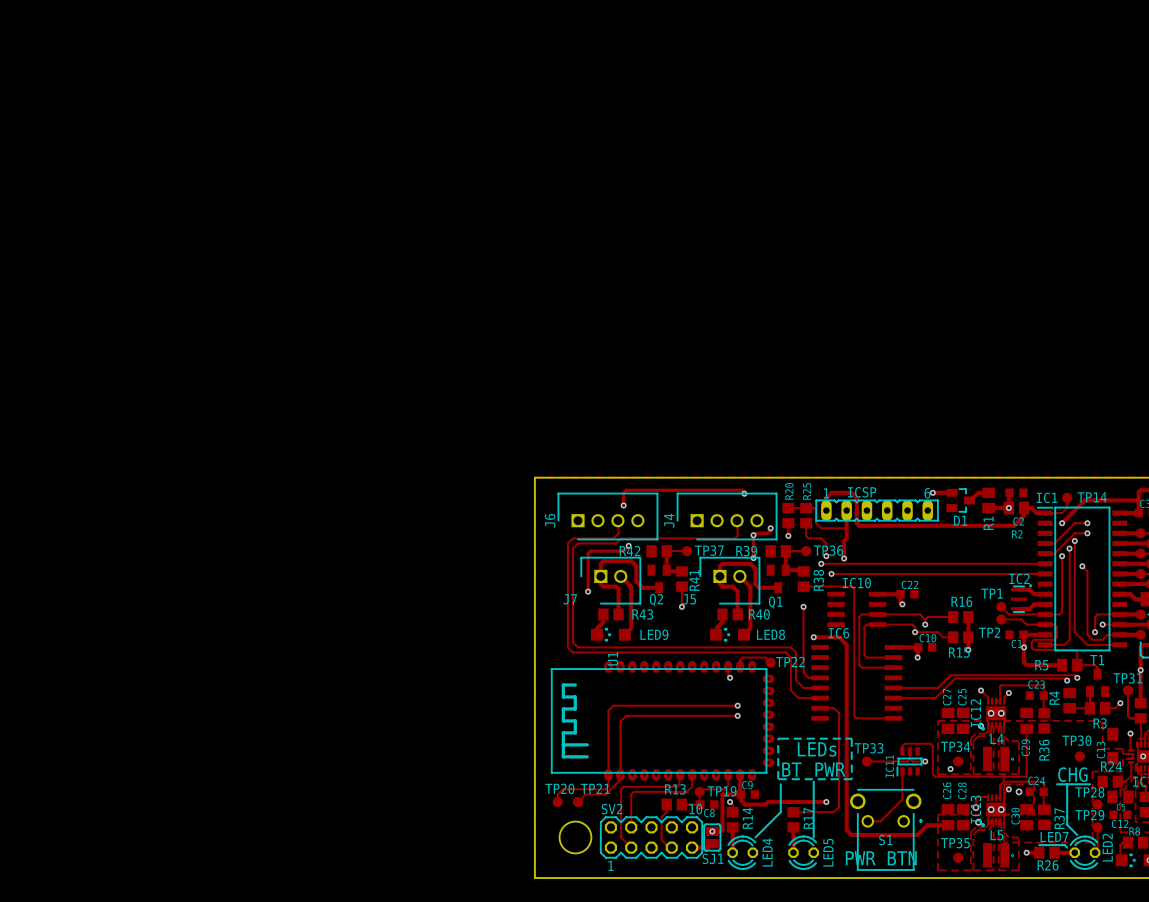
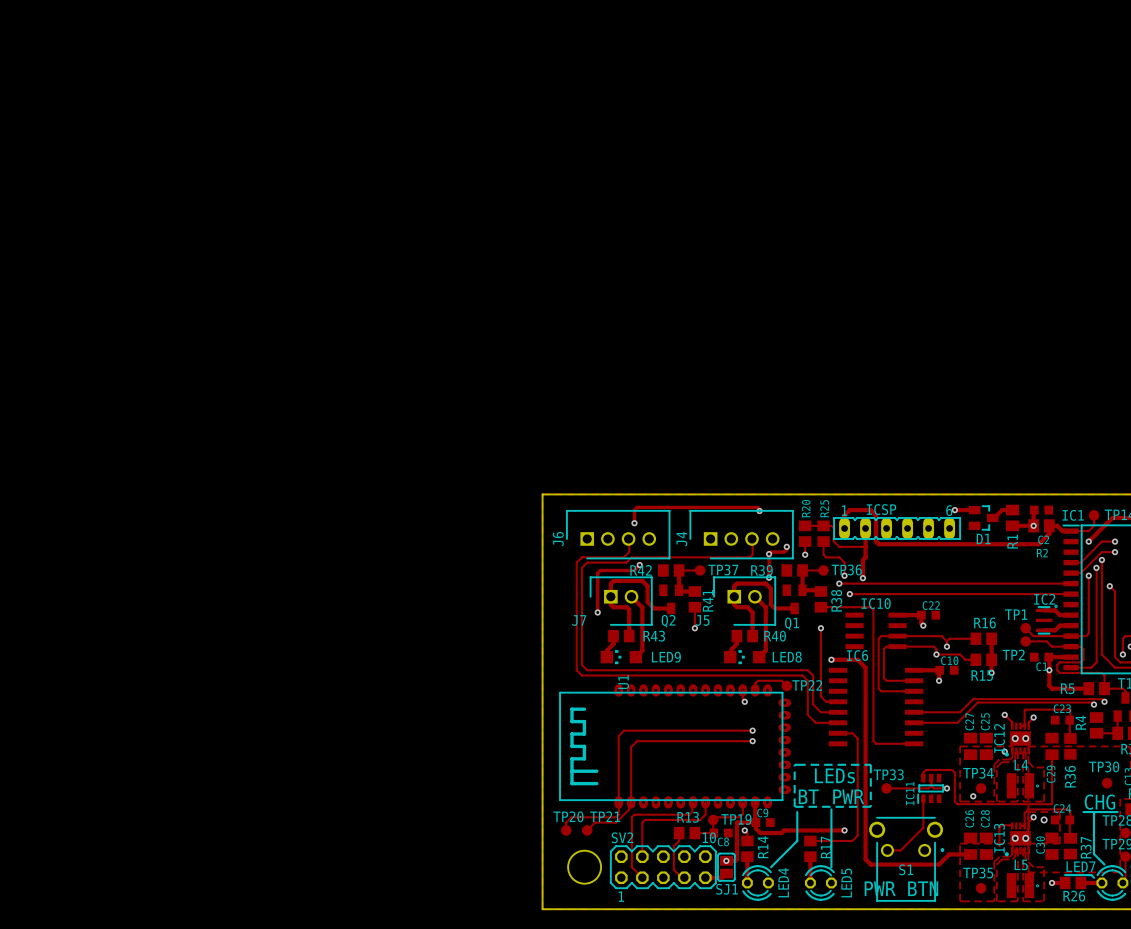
track: none -> (999, 836) (999, 846)
via: (975, 807) -> none
via: (978, 822) -> none

